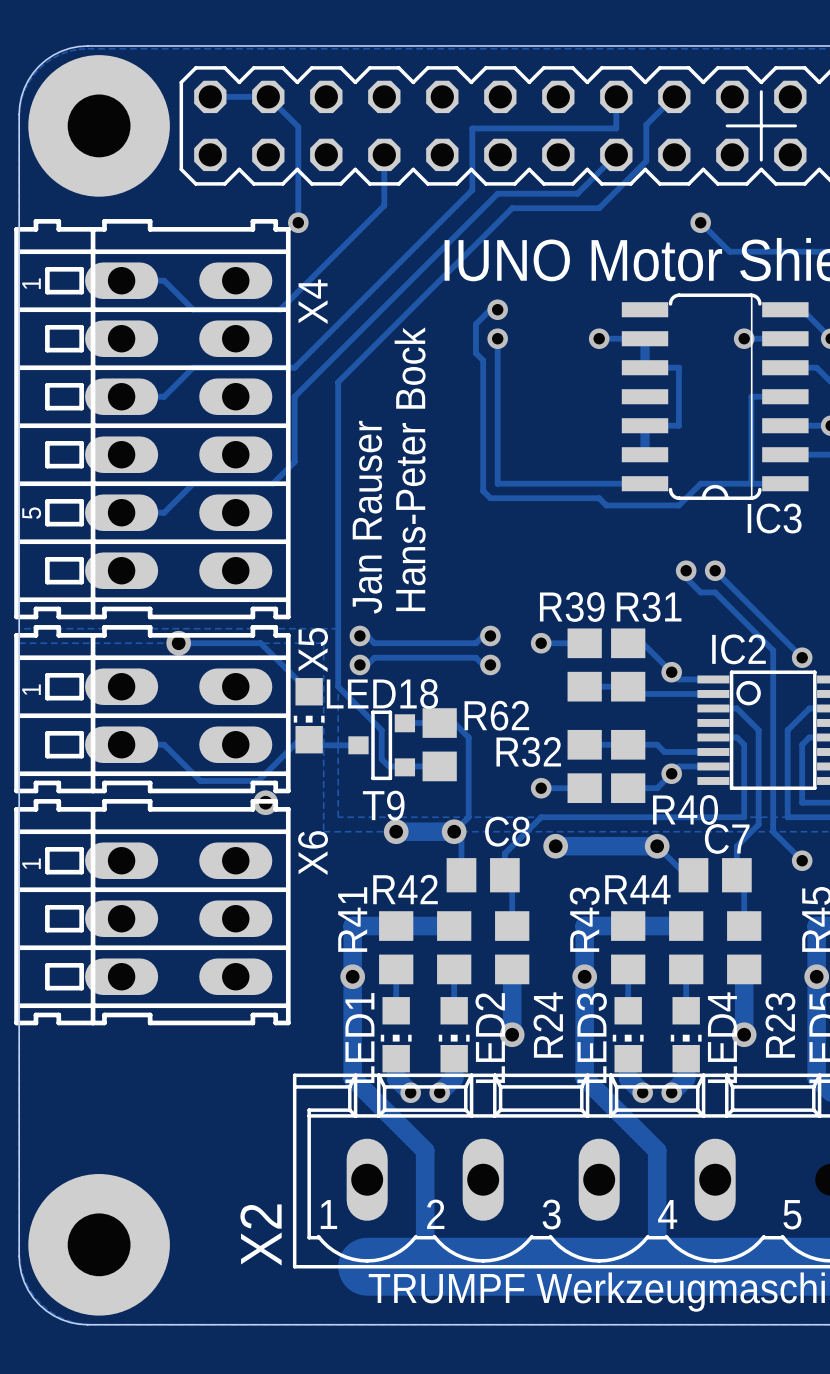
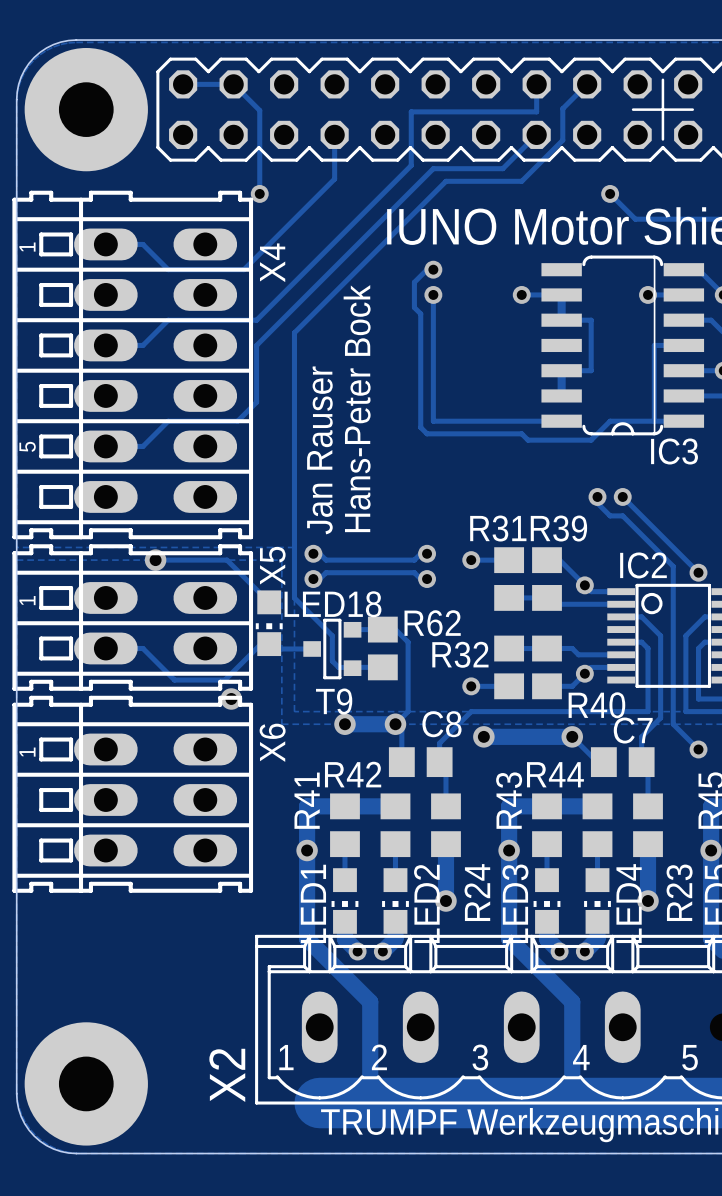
R39 name position: R39 (572, 606) -> R39 (558, 528)
R31 name position: R31 (649, 606) -> R31 (498, 528)

